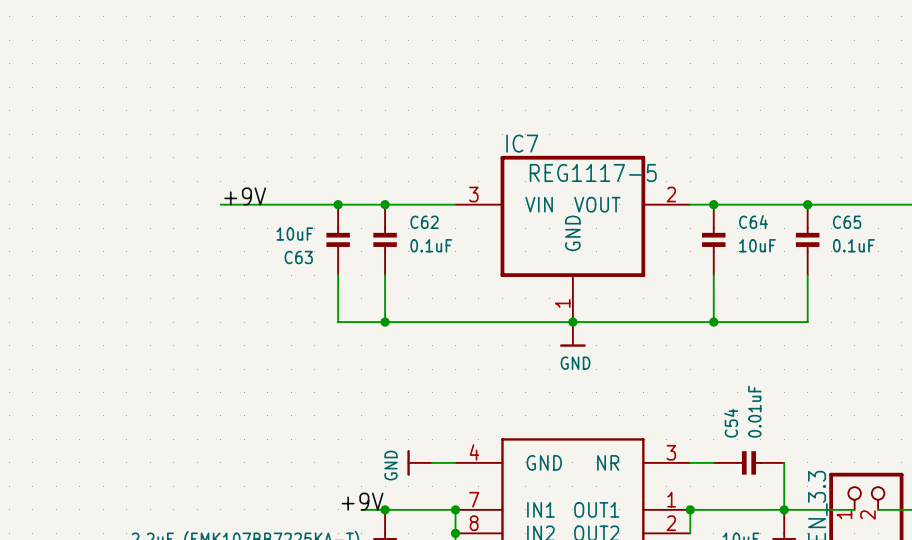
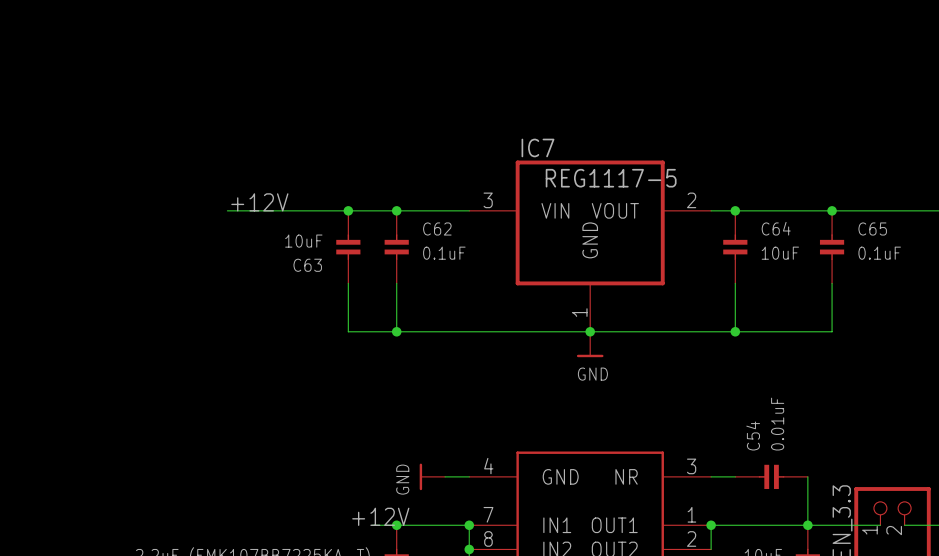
label: +9V (245, 196) -> +12V (259, 202)
label: +9V (362, 501) -> +12V (380, 516)

